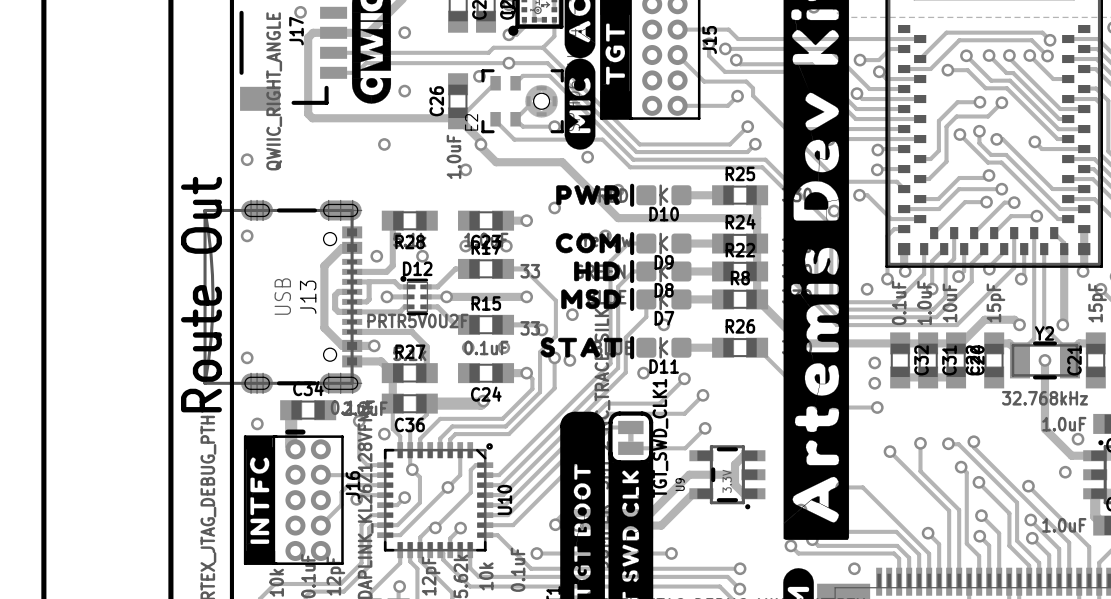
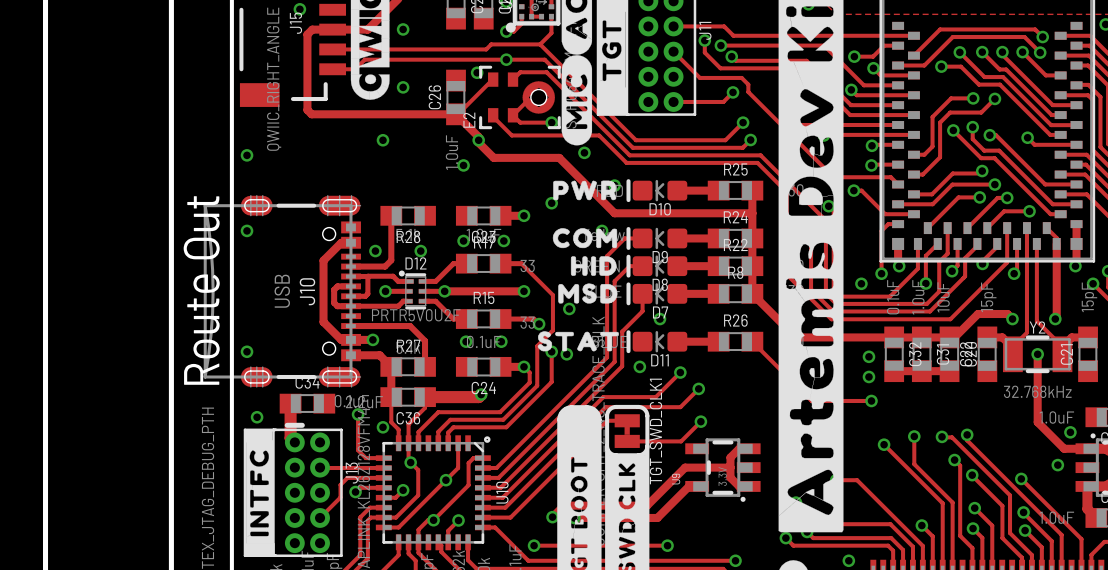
J17 name: J17 (296, 31) -> J15 (295, 23)
J15 name: J15 (709, 40) -> J11 (705, 30)
J13 name: J13 (308, 297) -> J10 (307, 291)
J16 name: J16 (352, 485) -> J13 (351, 473)

